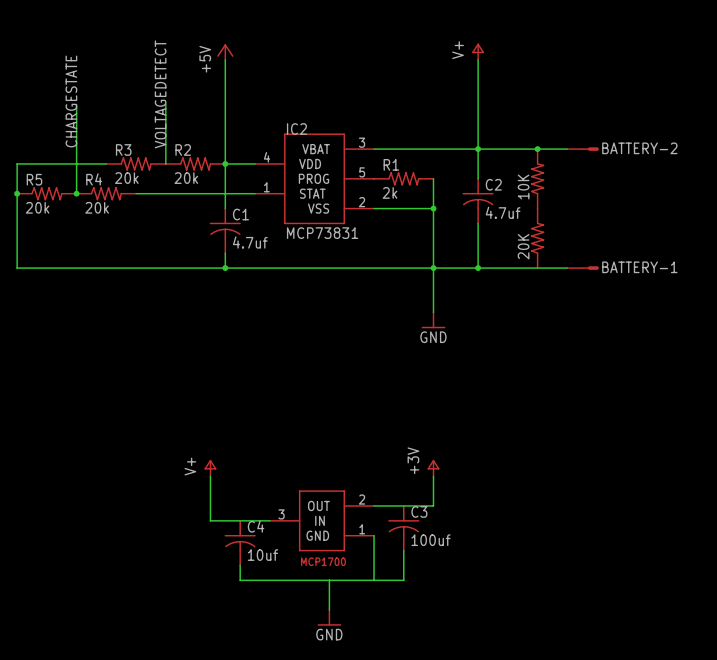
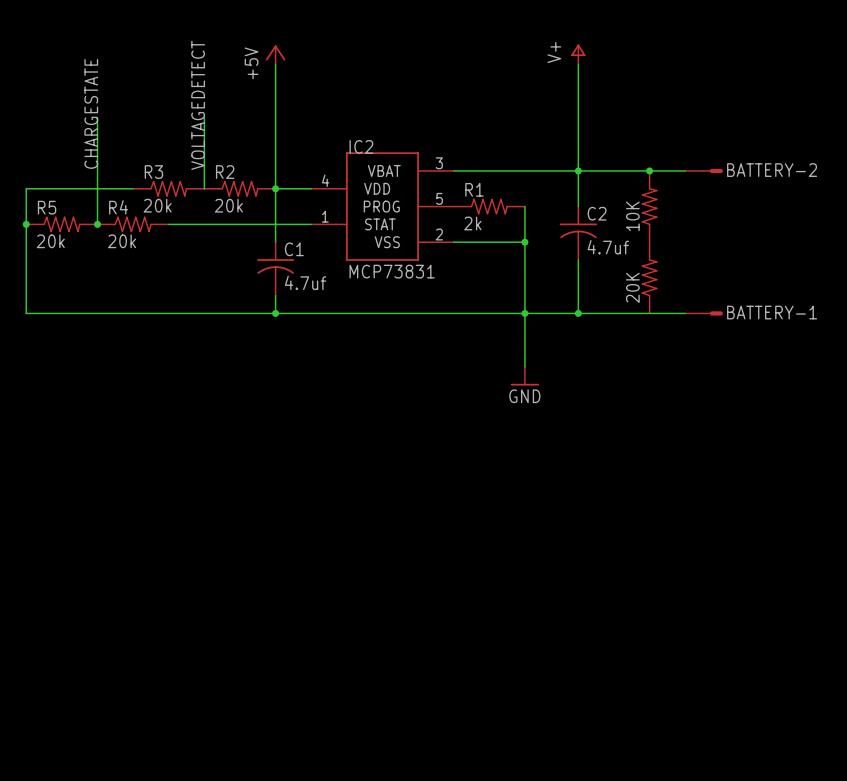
power symbol: V+ (210, 468) -> none
power symbol: +3V (433, 468) -> none
wire: (210, 476) (210, 520) (269, 520) -> none
wire: (433, 476) (433, 505) (374, 505) -> none
part: (321, 520) -> none
C3: 100uf (403, 528) -> none
wire: (374, 535) (374, 580) -> none
C4: 10uf (240, 543) -> none
wire: (403, 550) (403, 580) (240, 580) (240, 565) -> none
wire: (329, 580) (329, 610) -> none
power symbol: GND (329, 617) -> none

